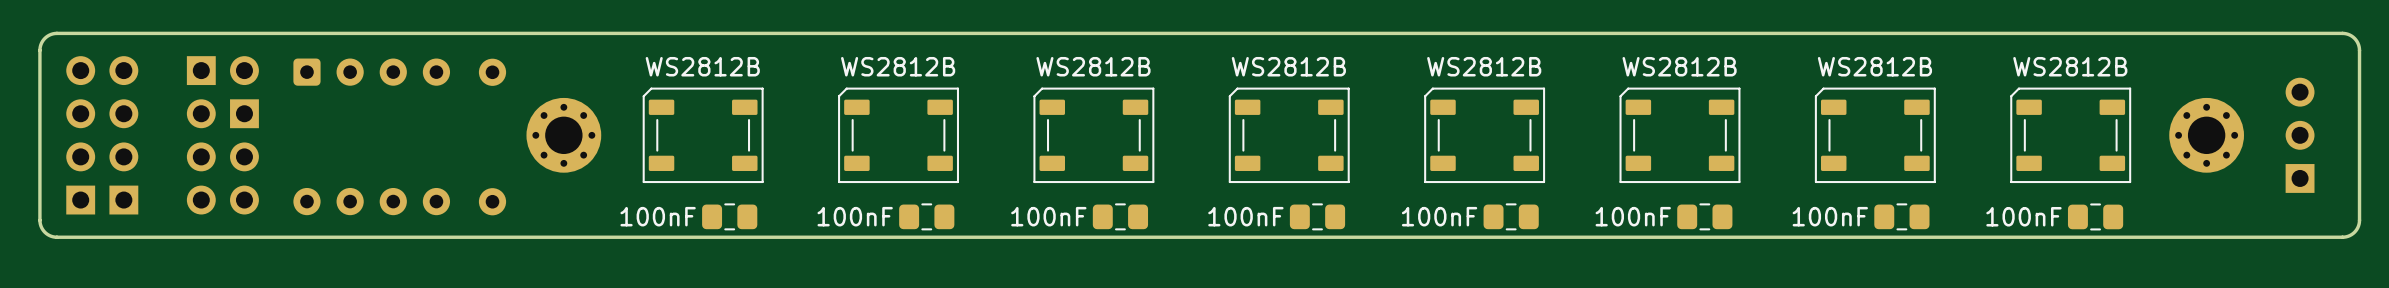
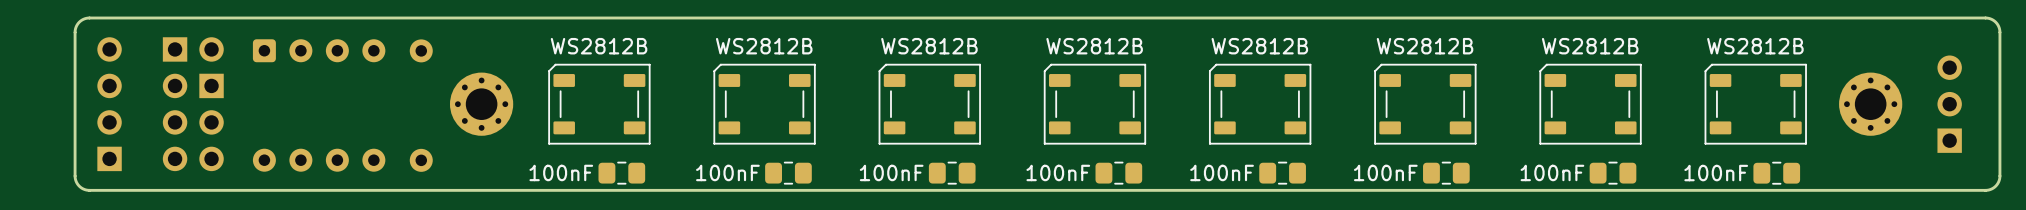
board edge: (100, 33) (53, 33) (43, 39) (39, 50) (40, 225) (44, 232) (53, 236) (100, 237) -> (89, 17) (79, 22) (75, 32) (75, 177) (80, 187) (89, 190)
part: (80, 135) -> none

